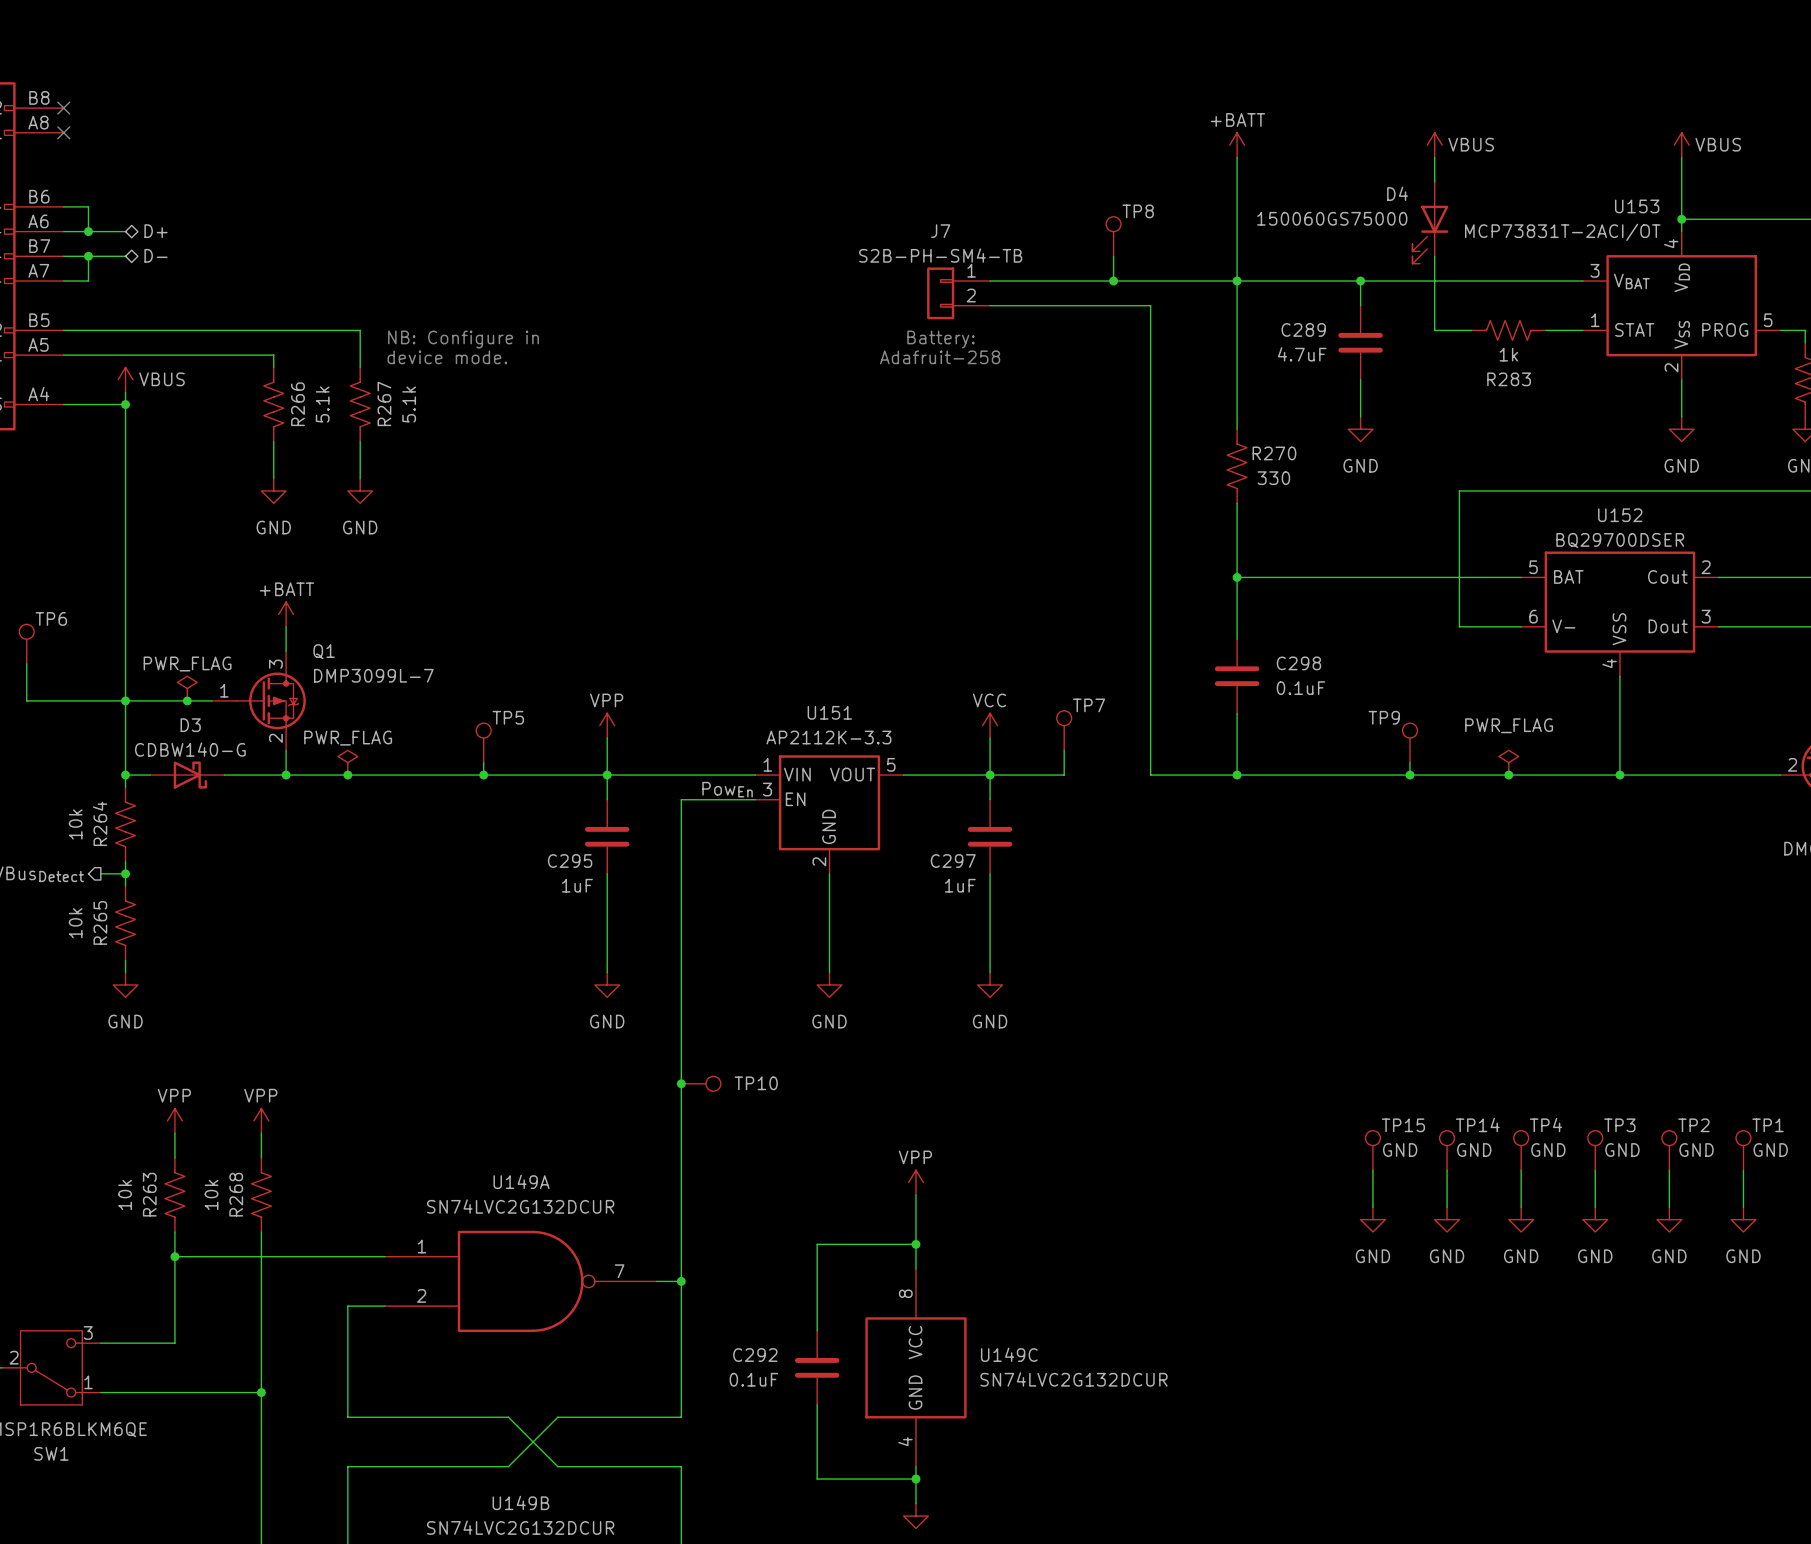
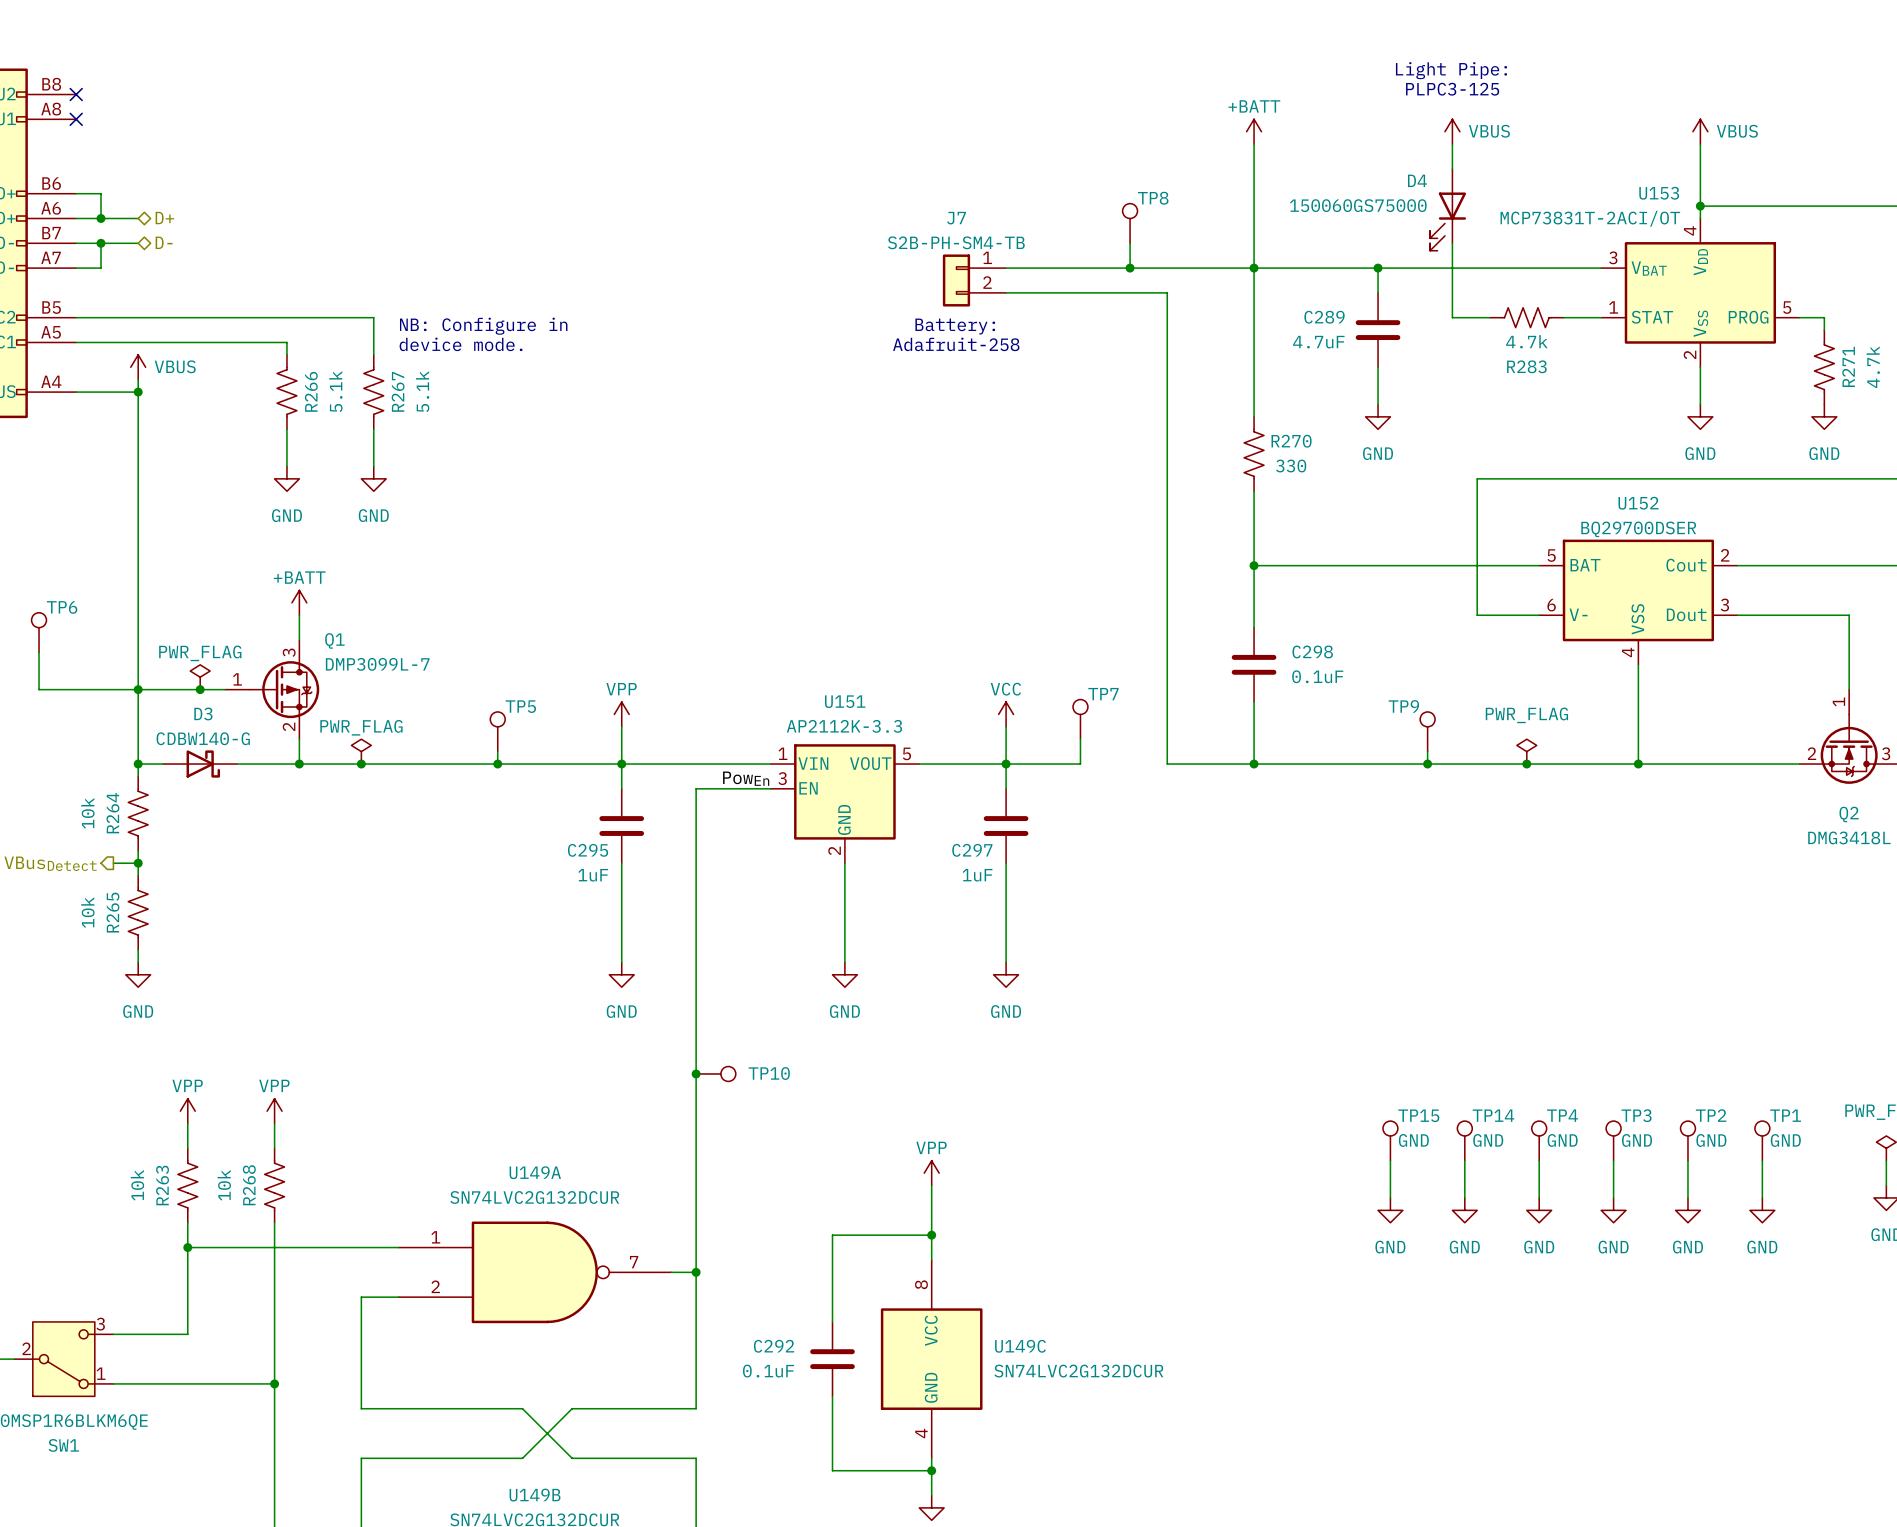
text: none -> Light Pipe: (1451, 70)
text: none -> PLPC3-125 (1452, 89)
R283 value: 1k (1508, 354) -> 4.7k (1526, 341)

